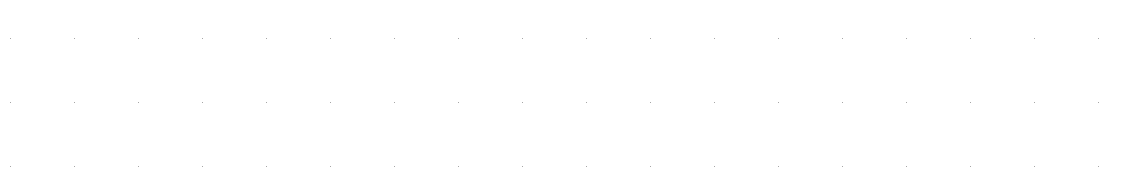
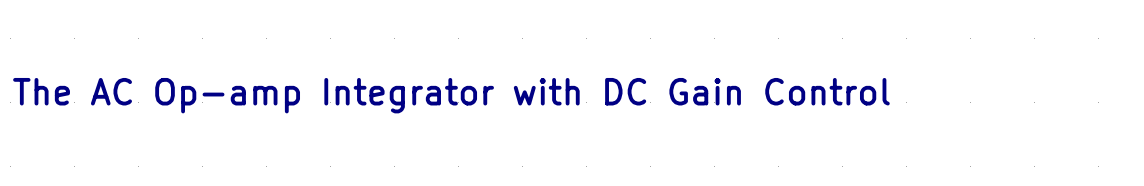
text: none -> The AC Op-amp Integrator with DC Gain Control (451, 95)

